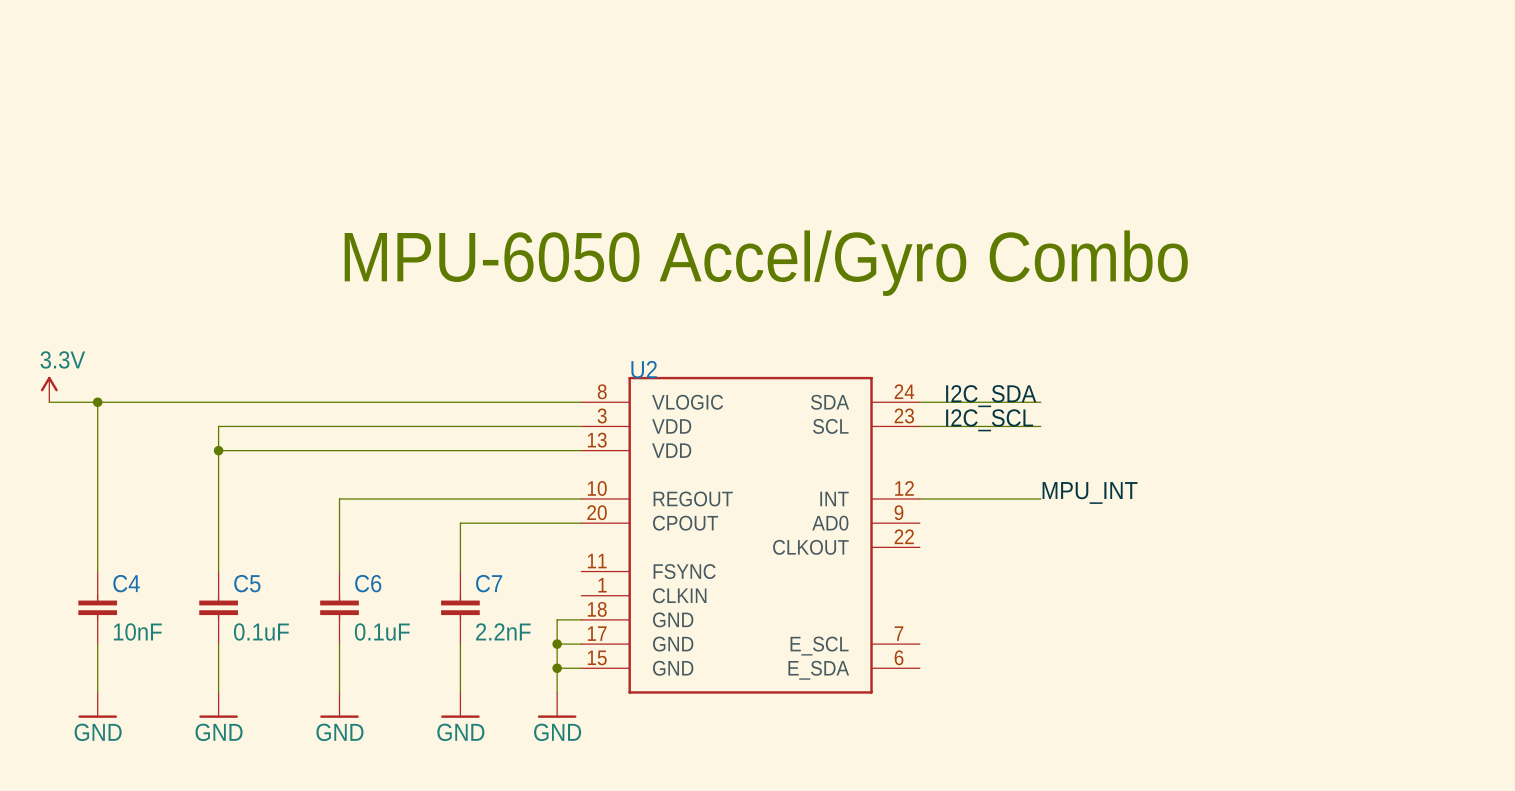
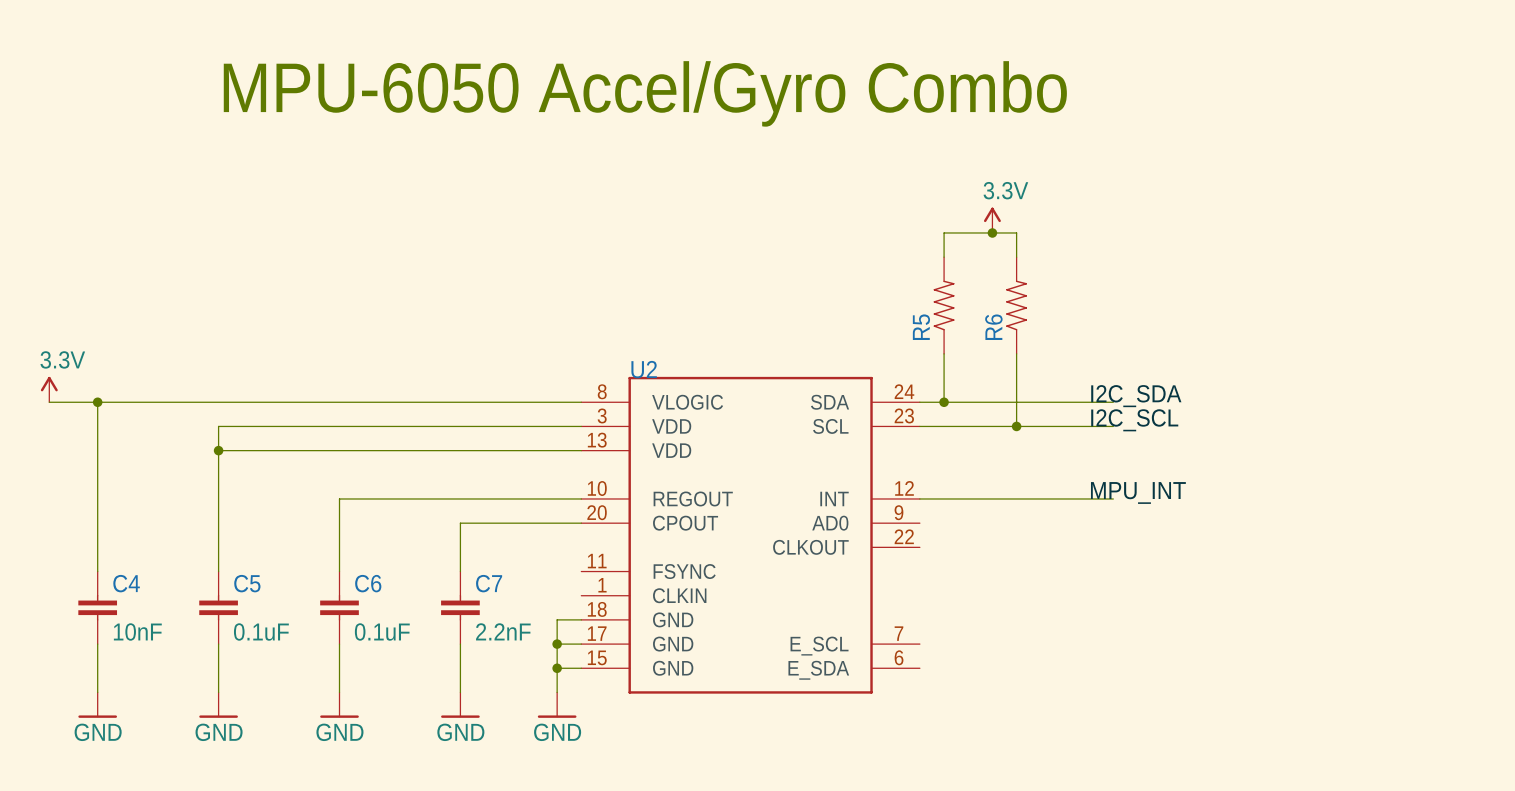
power symbol: none -> 3.3V (992, 220)
junction: none -> (992, 232)
wire: none -> (944, 257) (944, 232) (1016, 232) (1016, 257)
text position: MPU-6050 Accel/Gyro Combo (766, 263) -> MPU-6050 Accel/Gyro Combo (645, 93)
R5: none -> (944, 305)
R6: none -> (1016, 305)
wire: none -> (944, 353) (944, 402)
wire: none -> (1016, 353) (1016, 426)
label position: I2C_SDA (991, 396) -> I2C_SDA (1136, 396)
junction: none -> (944, 402)
wire: none -> (1040, 402) (1113, 402)
label position: I2C_SCL (989, 420) -> I2C_SCL (1134, 420)
junction: none -> (1016, 426)
wire: none -> (1040, 426) (1113, 426)
label position: MPU_INT (1090, 492) -> MPU_INT (1138, 492)
wire: none -> (1040, 498) (1113, 498)

